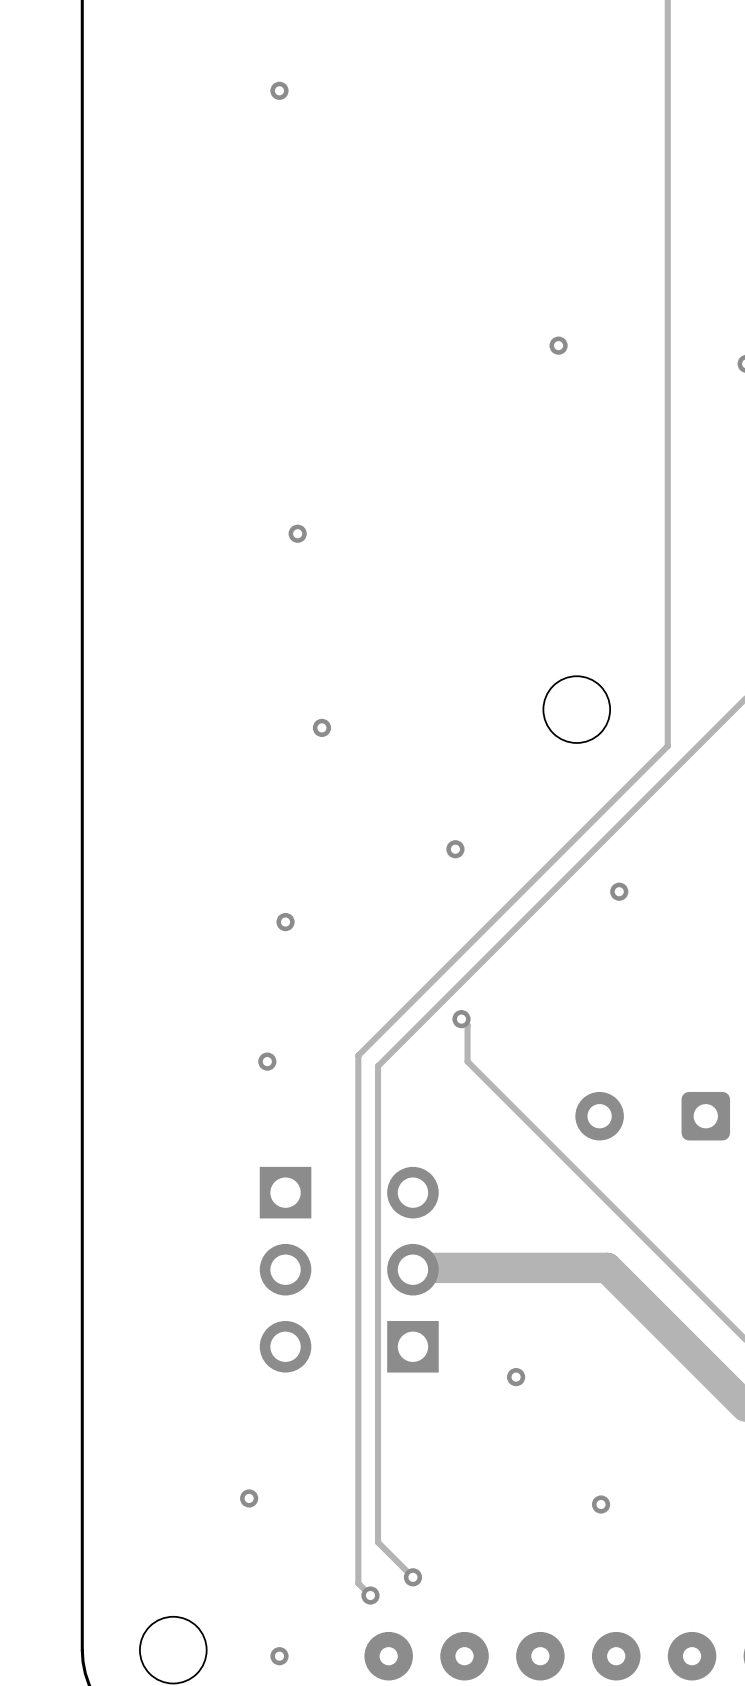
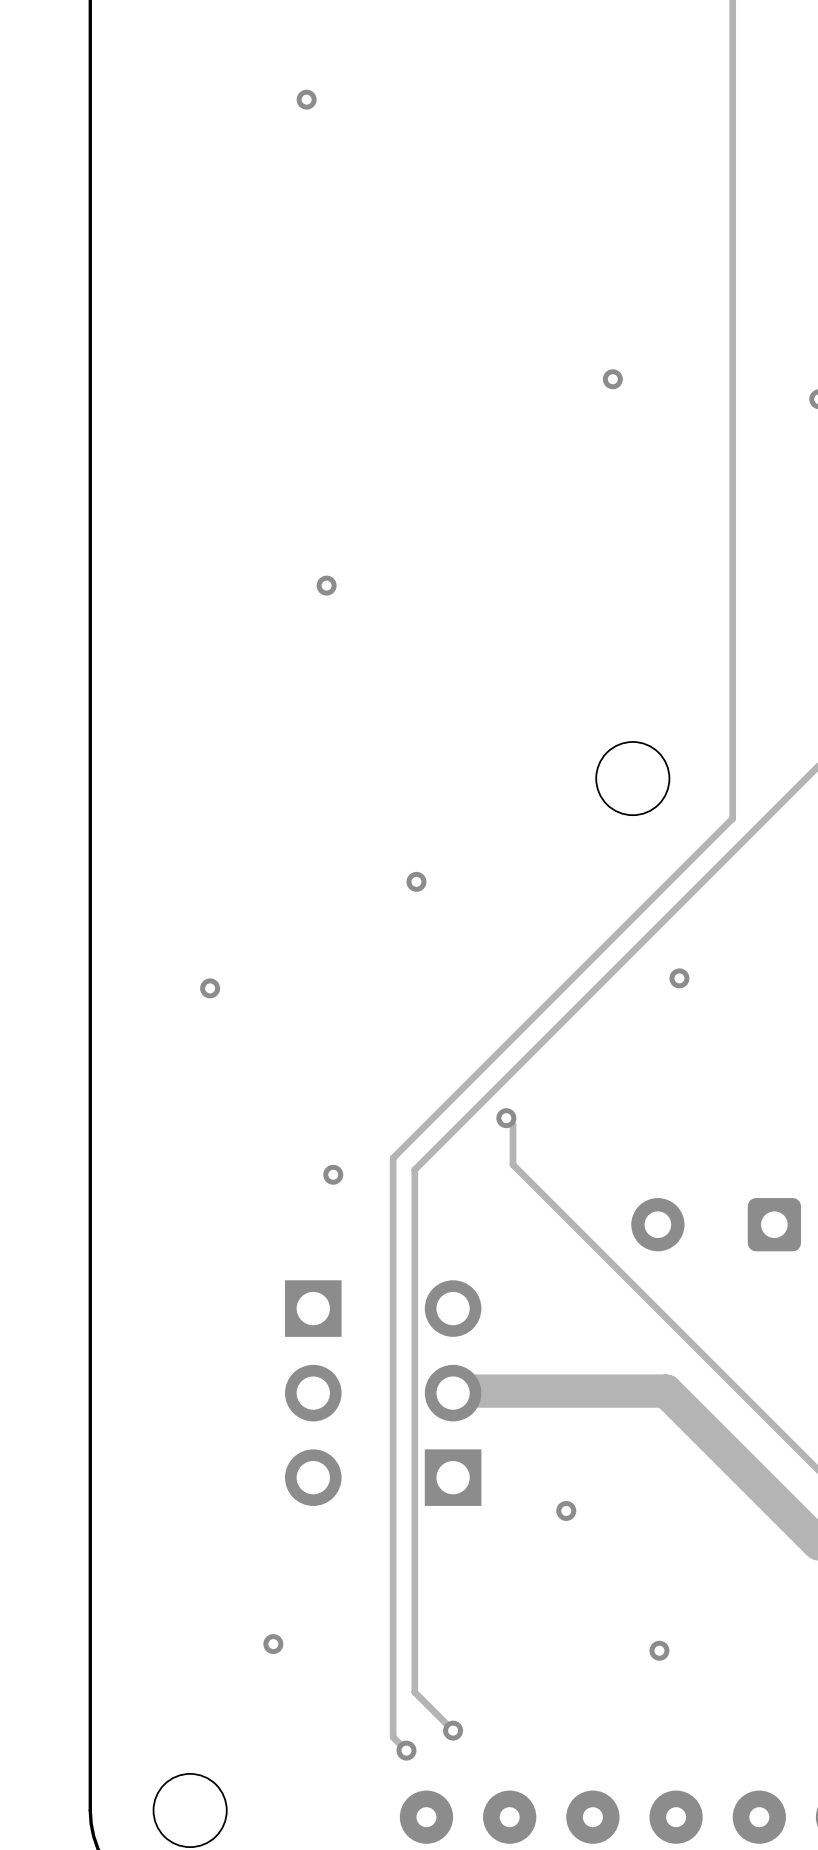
via: (321, 727) -> none
via: none -> (416, 881)
via: (455, 849) -> none
via: none -> (210, 988)
via: (285, 922) -> none
via position: (267, 1061) -> (333, 1174)
via: (279, 1656) -> none

